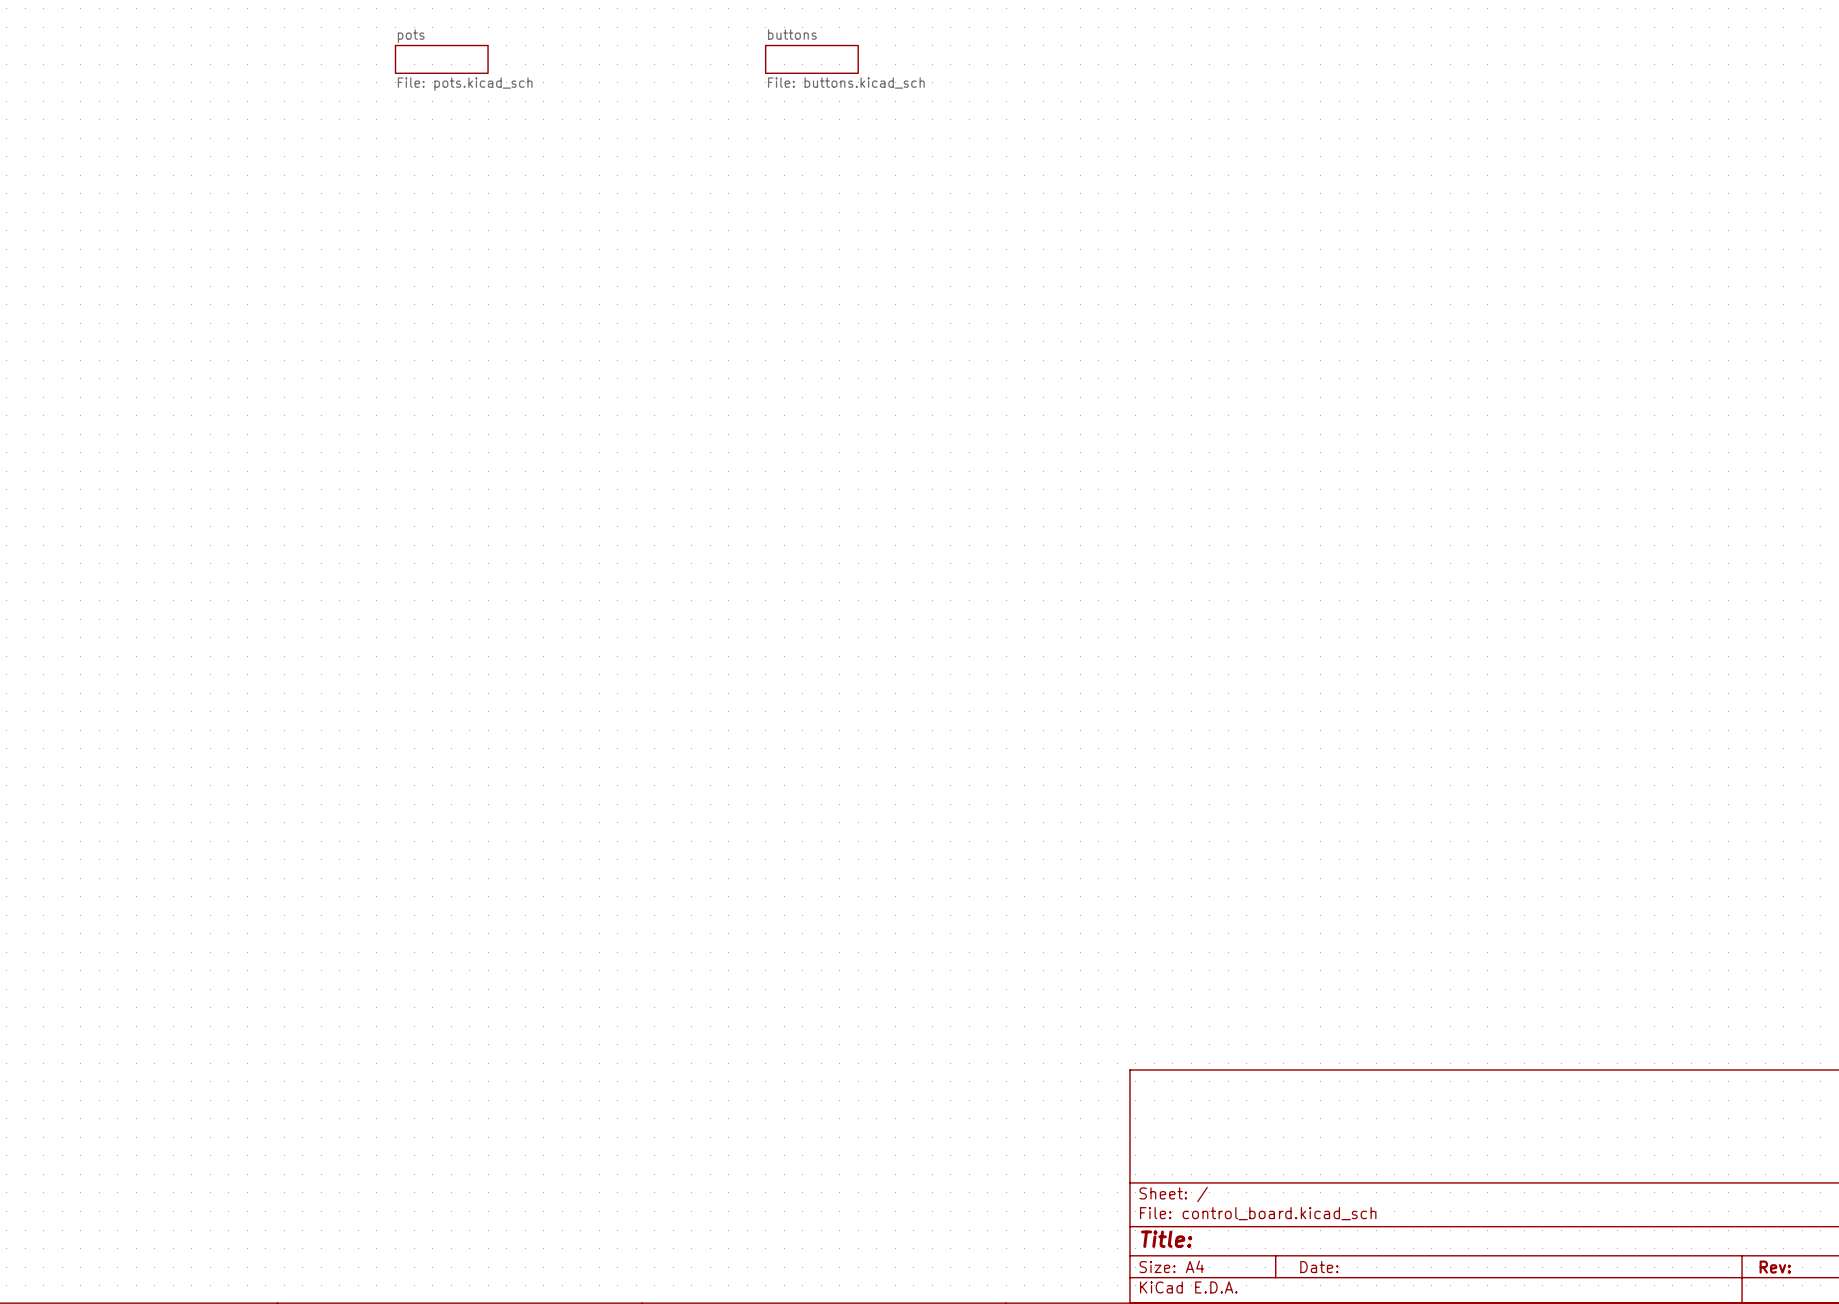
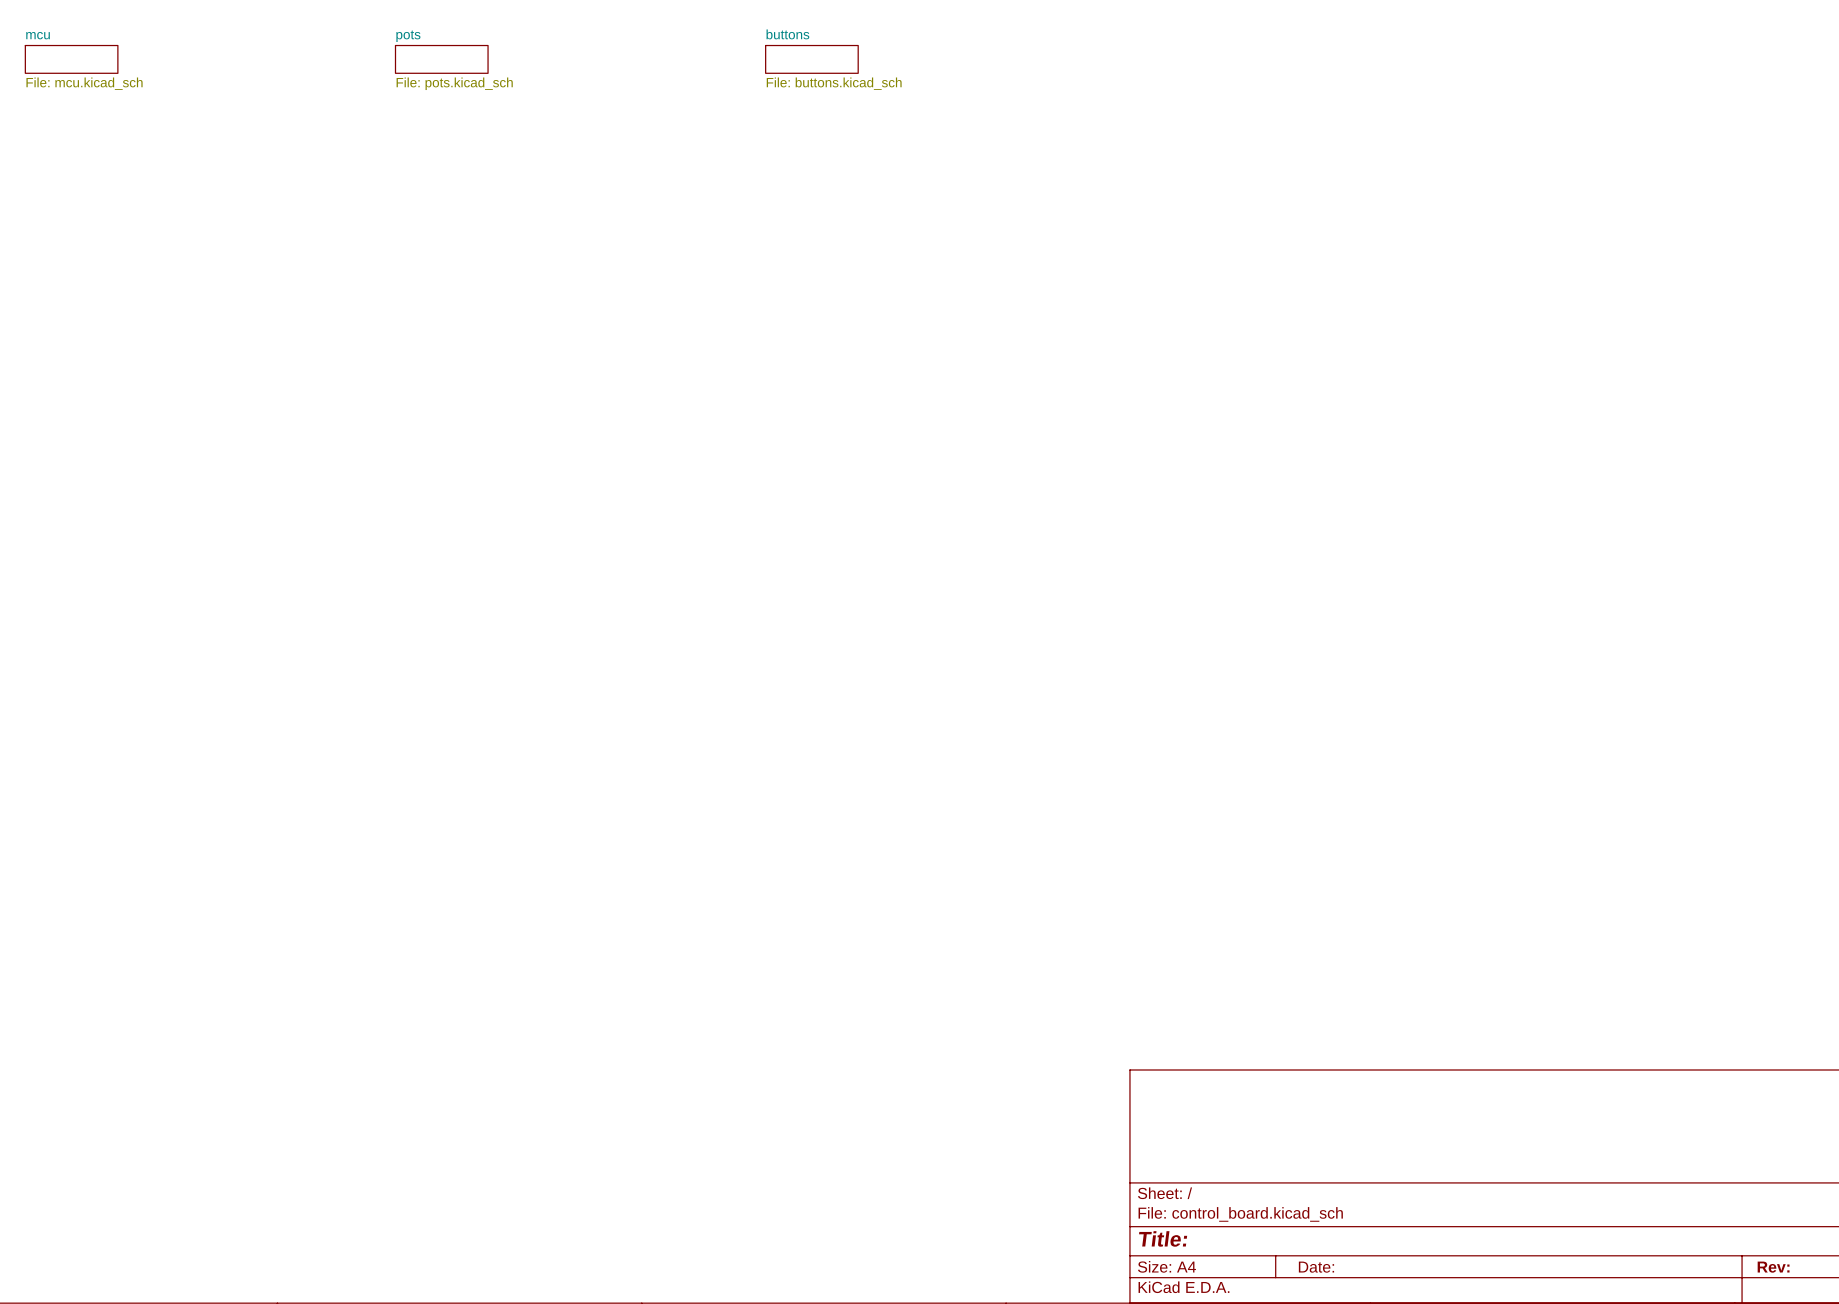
sheet mcu: none -> File: mcu.kicad_sch (71, 59)

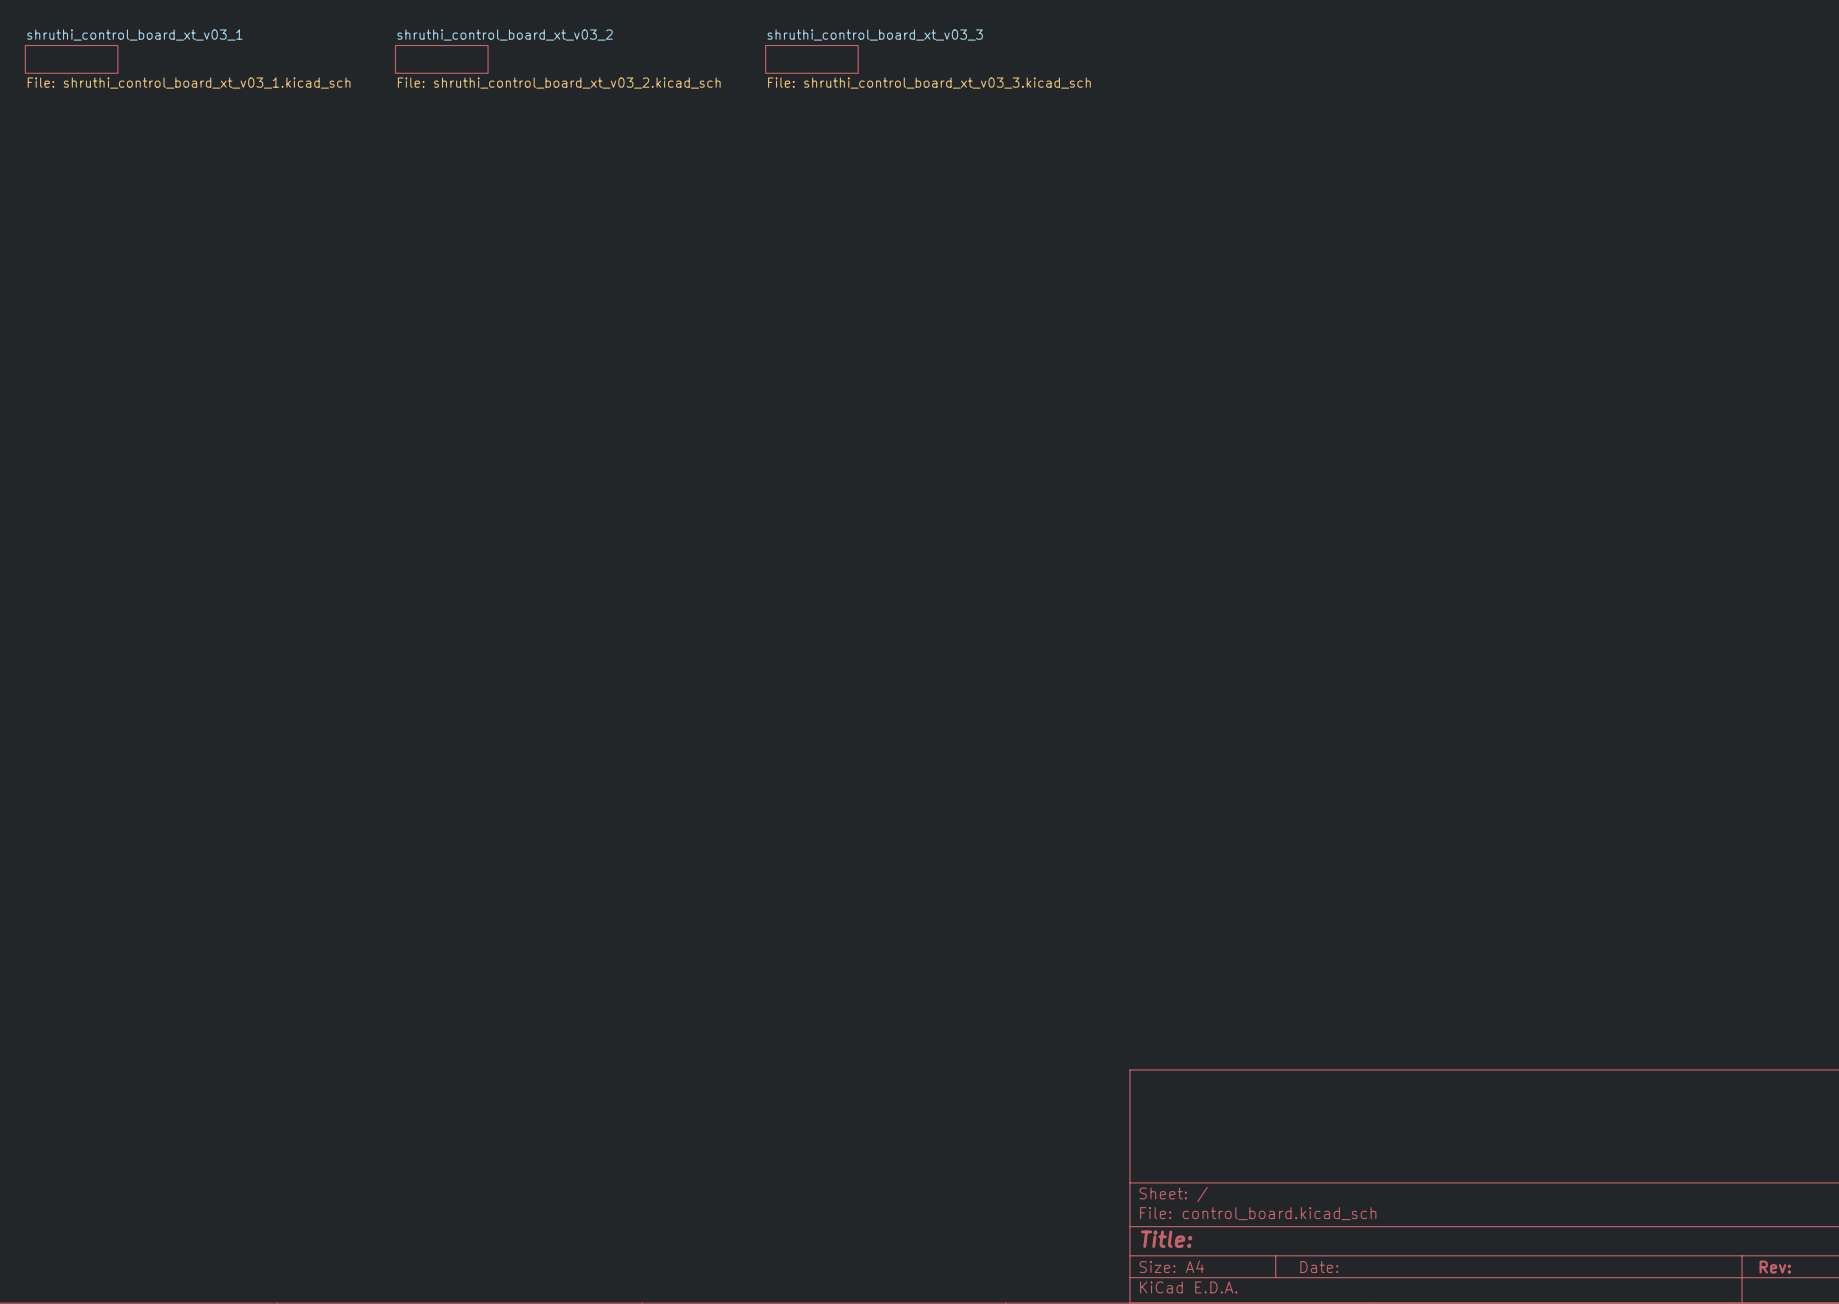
sheet buttons name: buttons (787, 34) -> shruthi_control_board_xt_v03_3 (875, 35)
sheet mcu name: mcu (38, 35) -> shruthi_control_board_xt_v03_1 (134, 35)
sheet pots name: pots (408, 36) -> shruthi_control_board_xt_v03_2 (505, 35)
sheet mcu value: File: mcu.kicad_sch (84, 83) -> File: shruthi_control_board_xt_v03_1.kicad_sch (189, 83)
sheet pots value: File: pots.kicad_sch (454, 83) -> File: shruthi_control_board_xt_v03_2.kicad_sch (559, 83)
sheet buttons value: File: buttons.kicad_sch (834, 83) -> File: shruthi_control_board_xt_v03_3.kicad_sch (929, 83)

